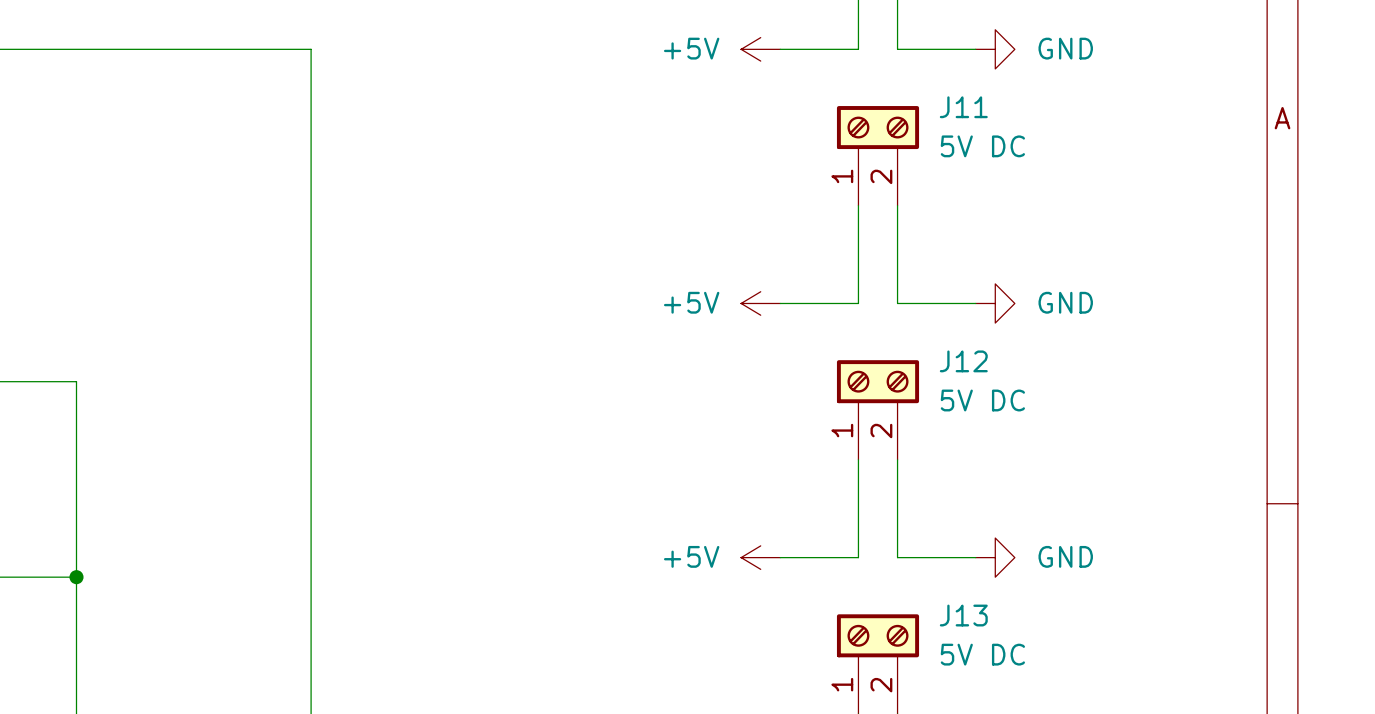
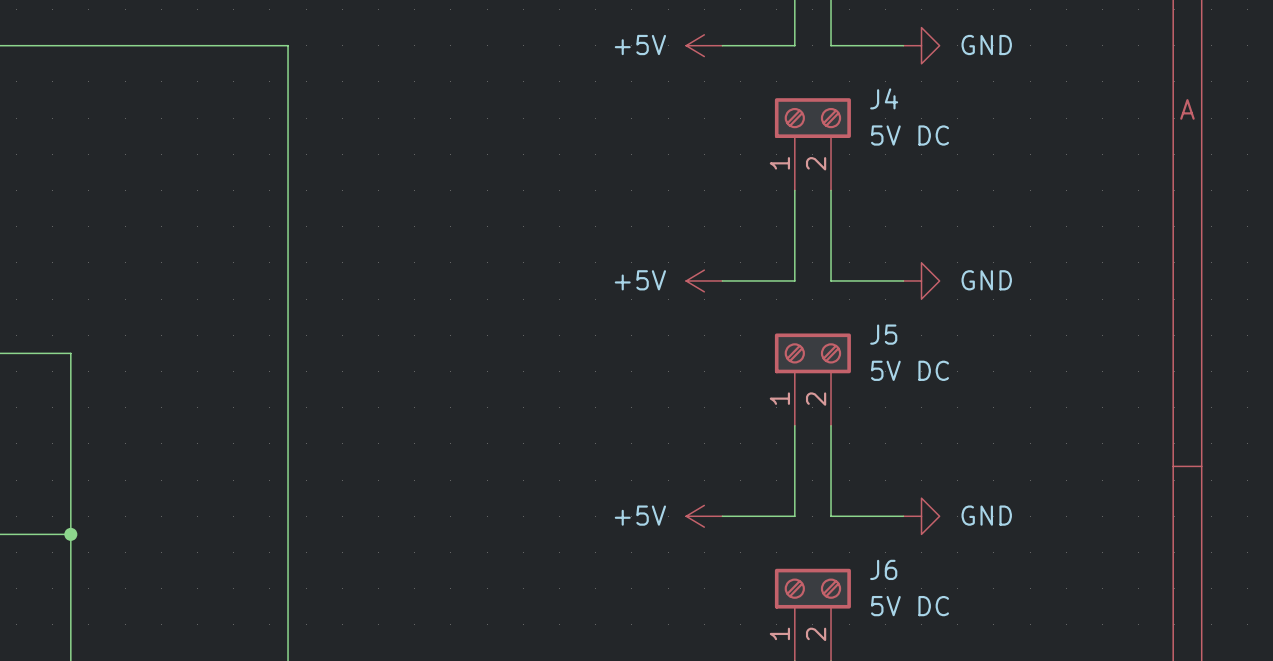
J11 name: J11 (963, 107) -> J4 (884, 98)
J12 name: J12 (963, 361) -> J5 (883, 334)
J13 name: J13 (963, 615) -> J6 (883, 569)

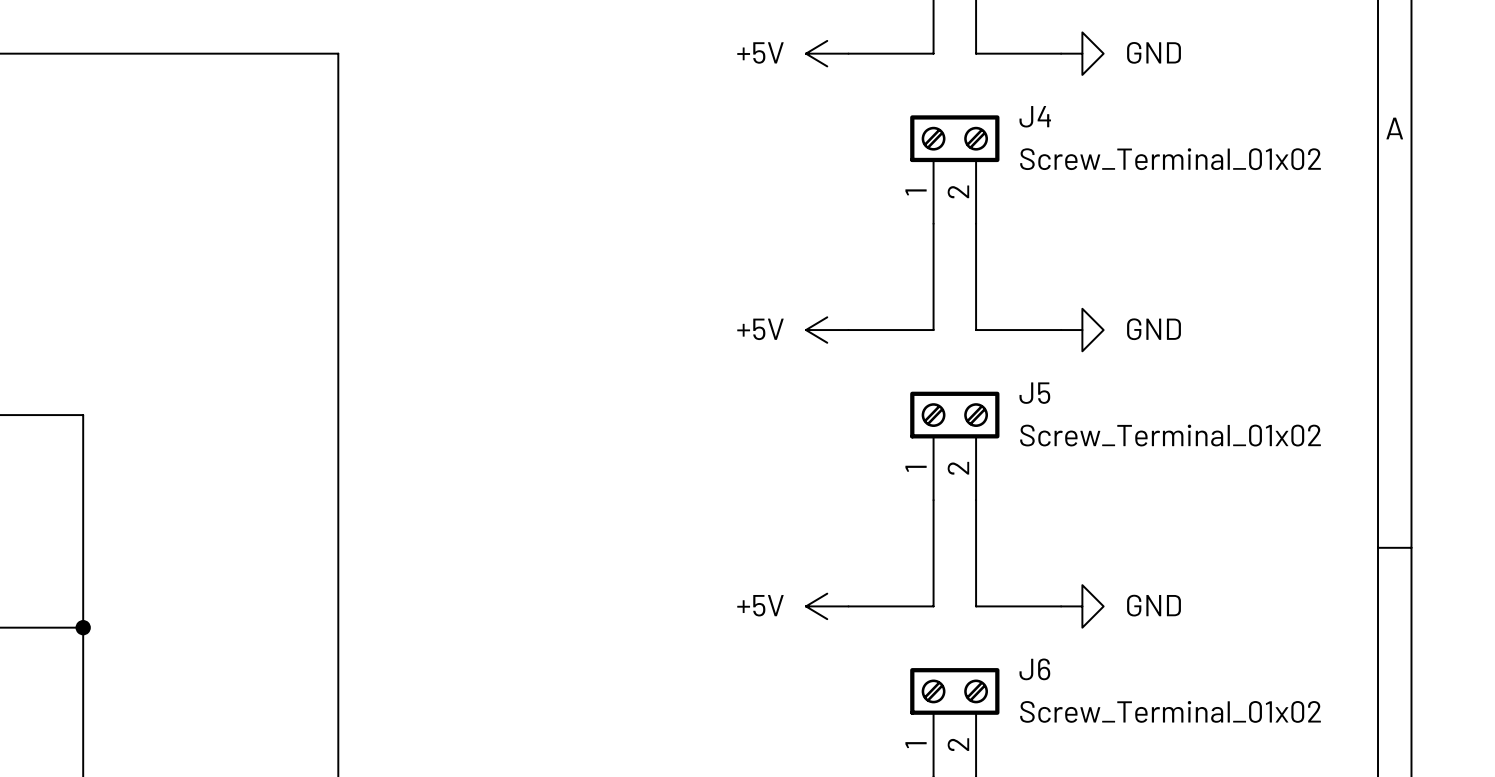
J4 value: 5V DC (910, 135) -> Screw_Terminal_01x02 (1170, 159)
J5 value: 5V DC (910, 370) -> Screw_Terminal_01x02 (1170, 435)
J6 value: 5V DC (910, 606) -> Screw_Terminal_01x02 (1170, 711)

